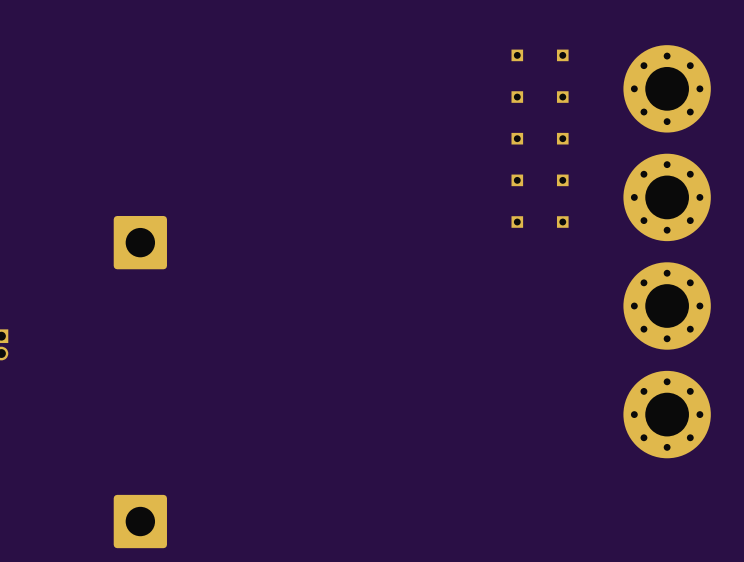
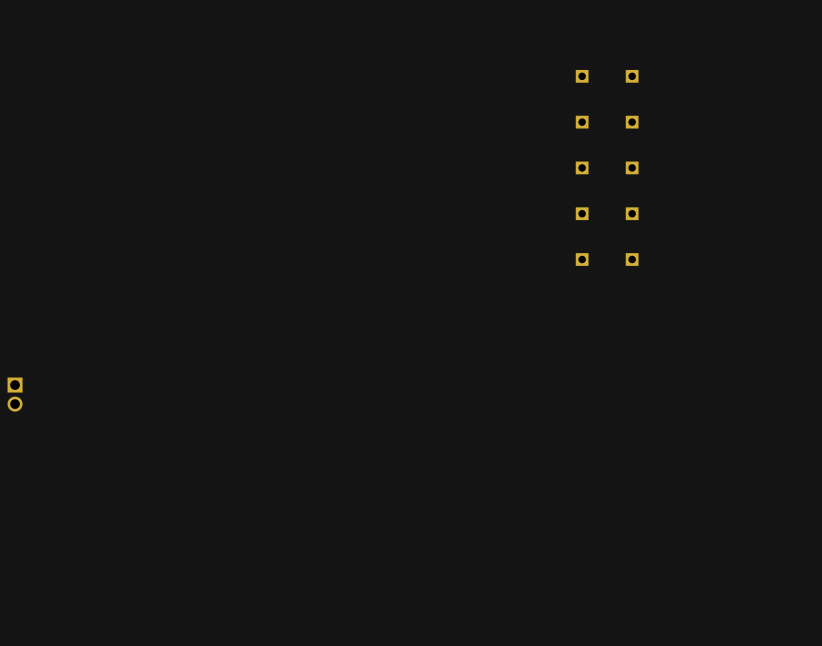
part: (667, 88) -> none
part: (667, 197) -> none
part: (140, 242) -> none
part: (667, 306) -> none
part: (667, 414) -> none
part: (140, 521) -> none

